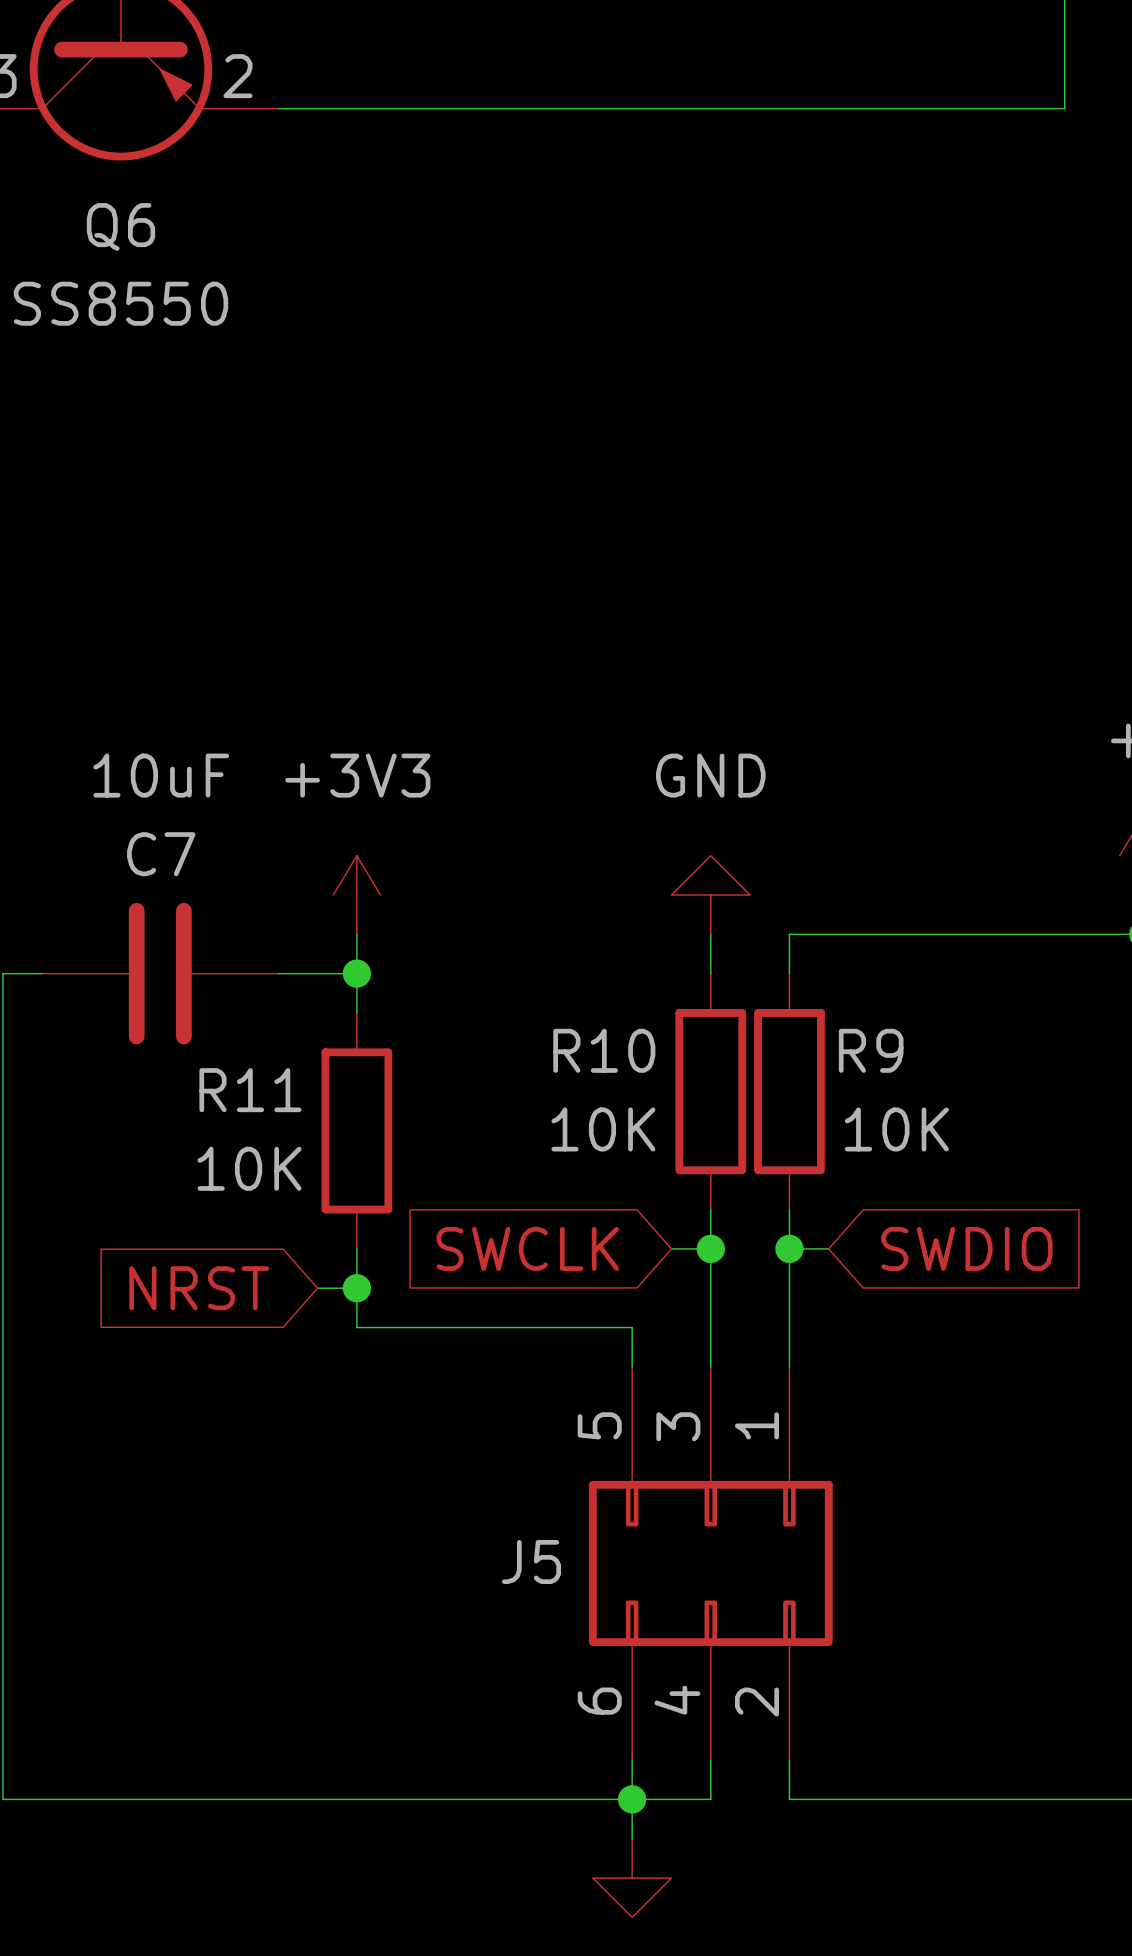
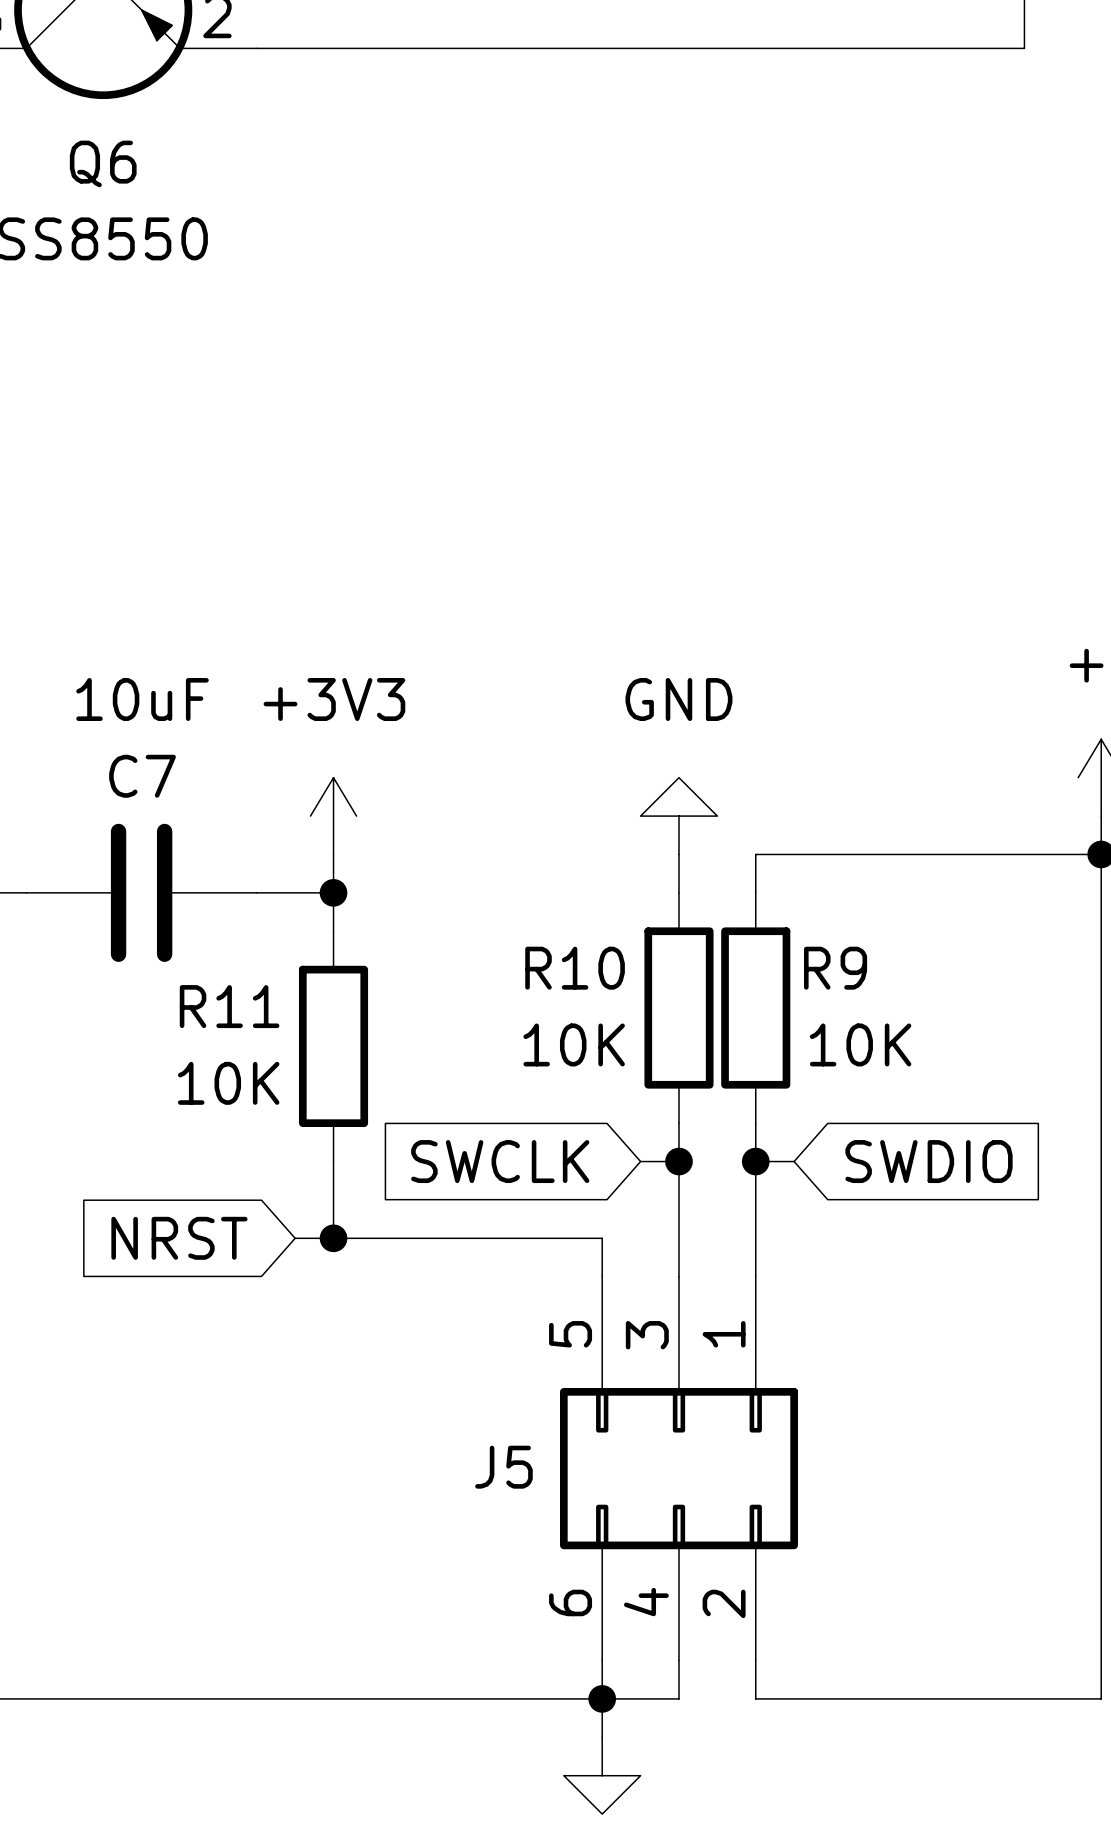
global label position: NRST (199, 1288) -> NRST (179, 1238)
wire: (317, 1288) (356, 1288) -> (295, 1238) (333, 1238)
junction position: (356, 1288) -> (333, 1238)

